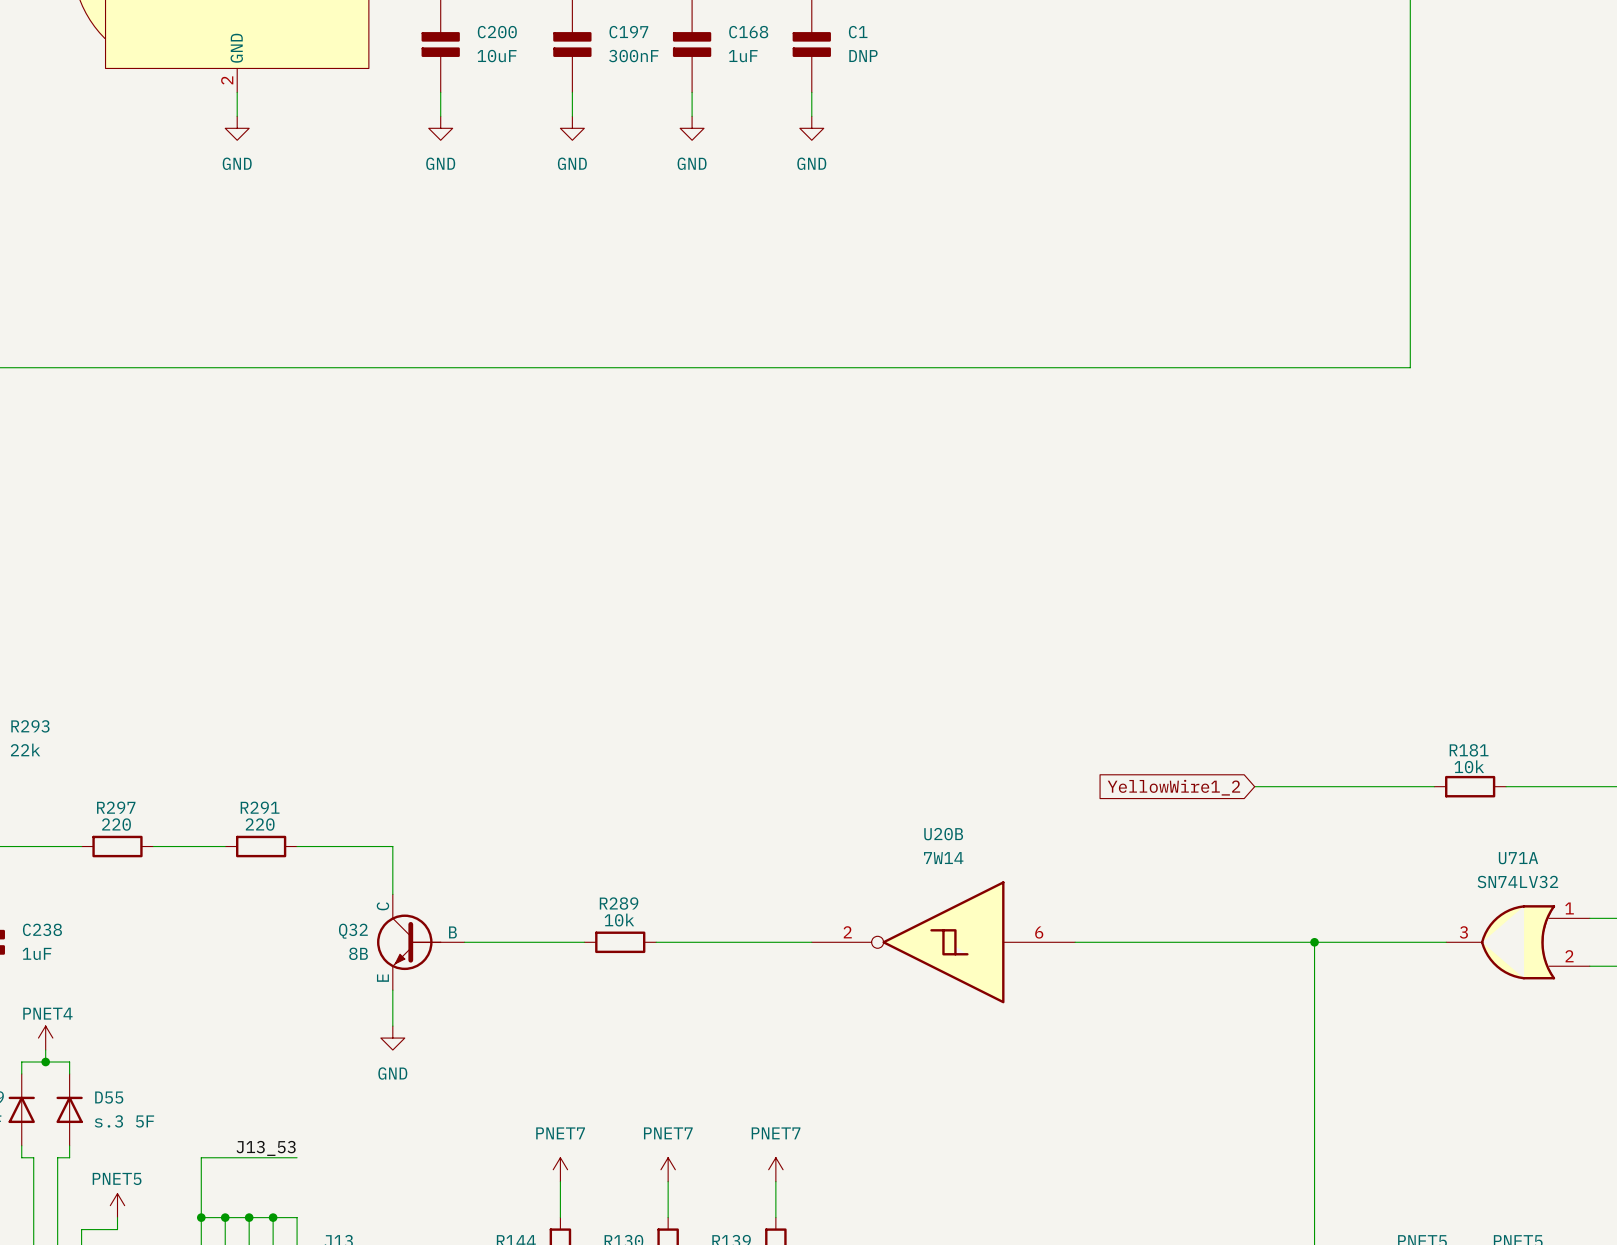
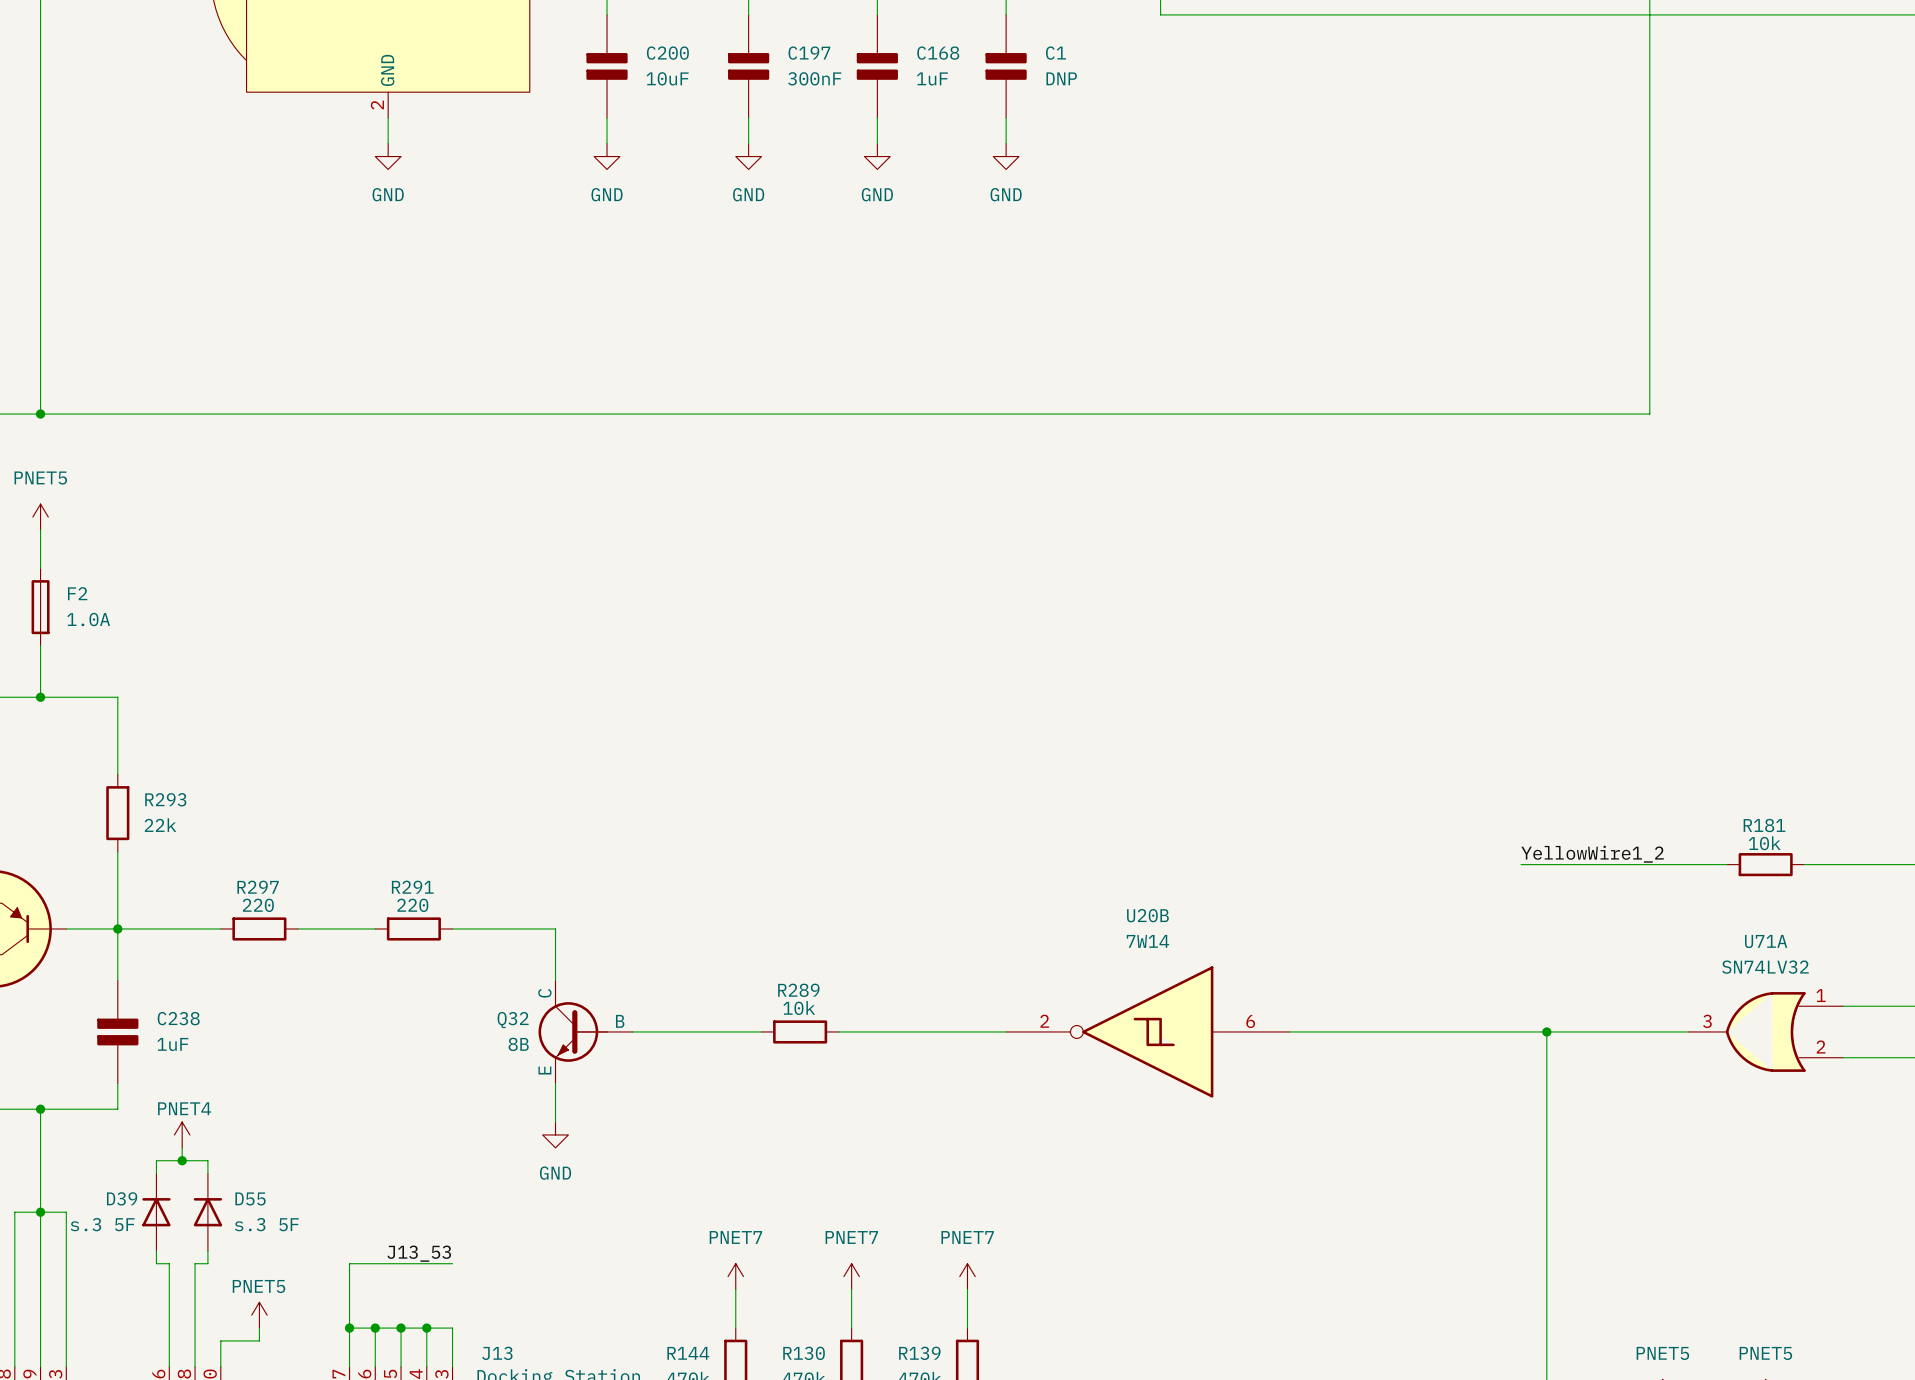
label: none -> YellowWire1_2 (1592, 854)
wire: (1254, 786) (1290, 786) -> none
R181 position: (1470, 786) -> (1765, 864)
wire: (1506, 786) (1553, 786) -> (1675, 864) (1727, 864)
global label: YellowWire1_2 (1173, 787) -> none

